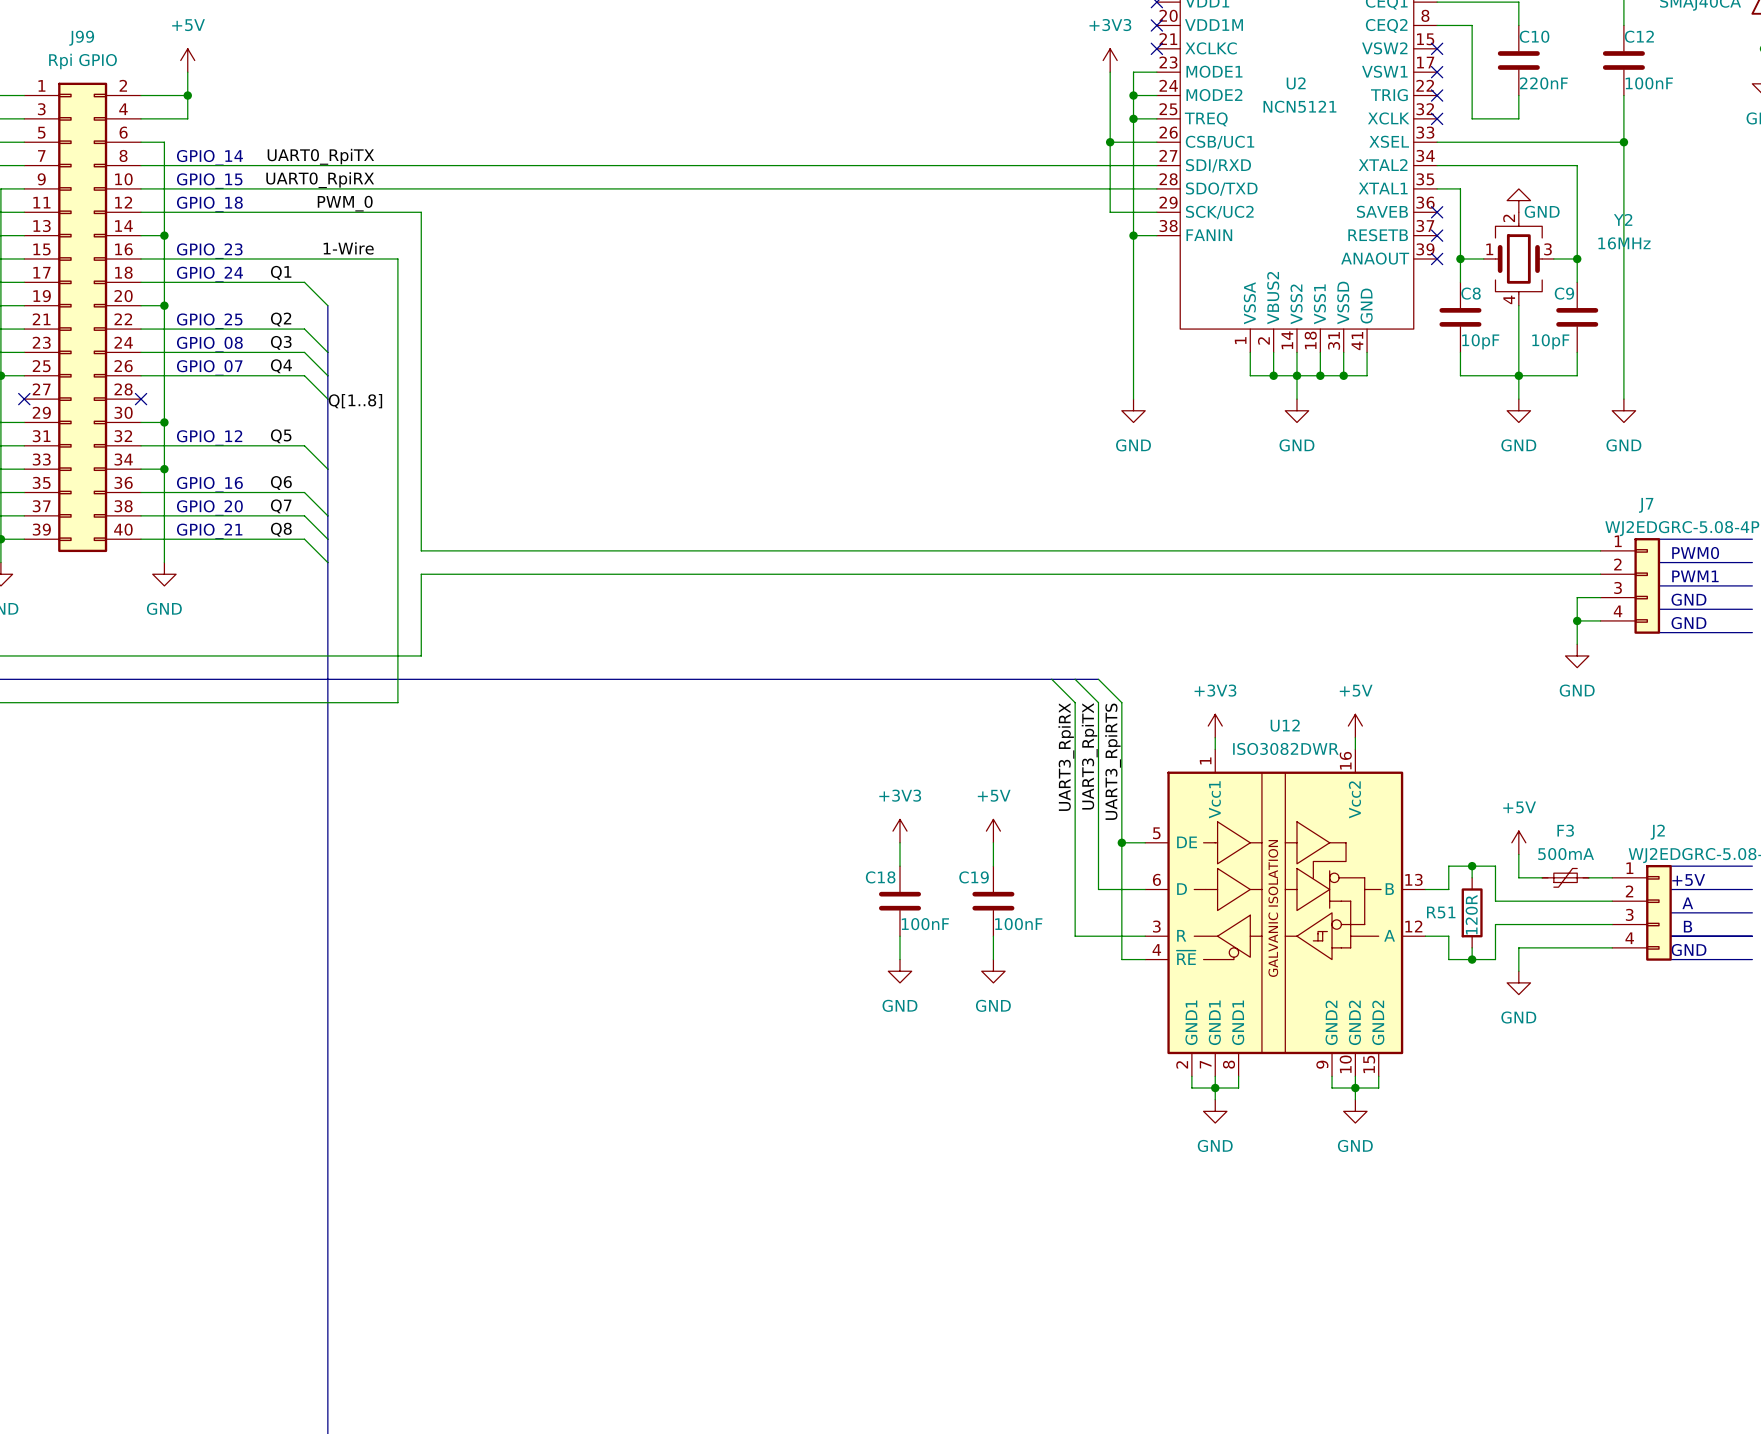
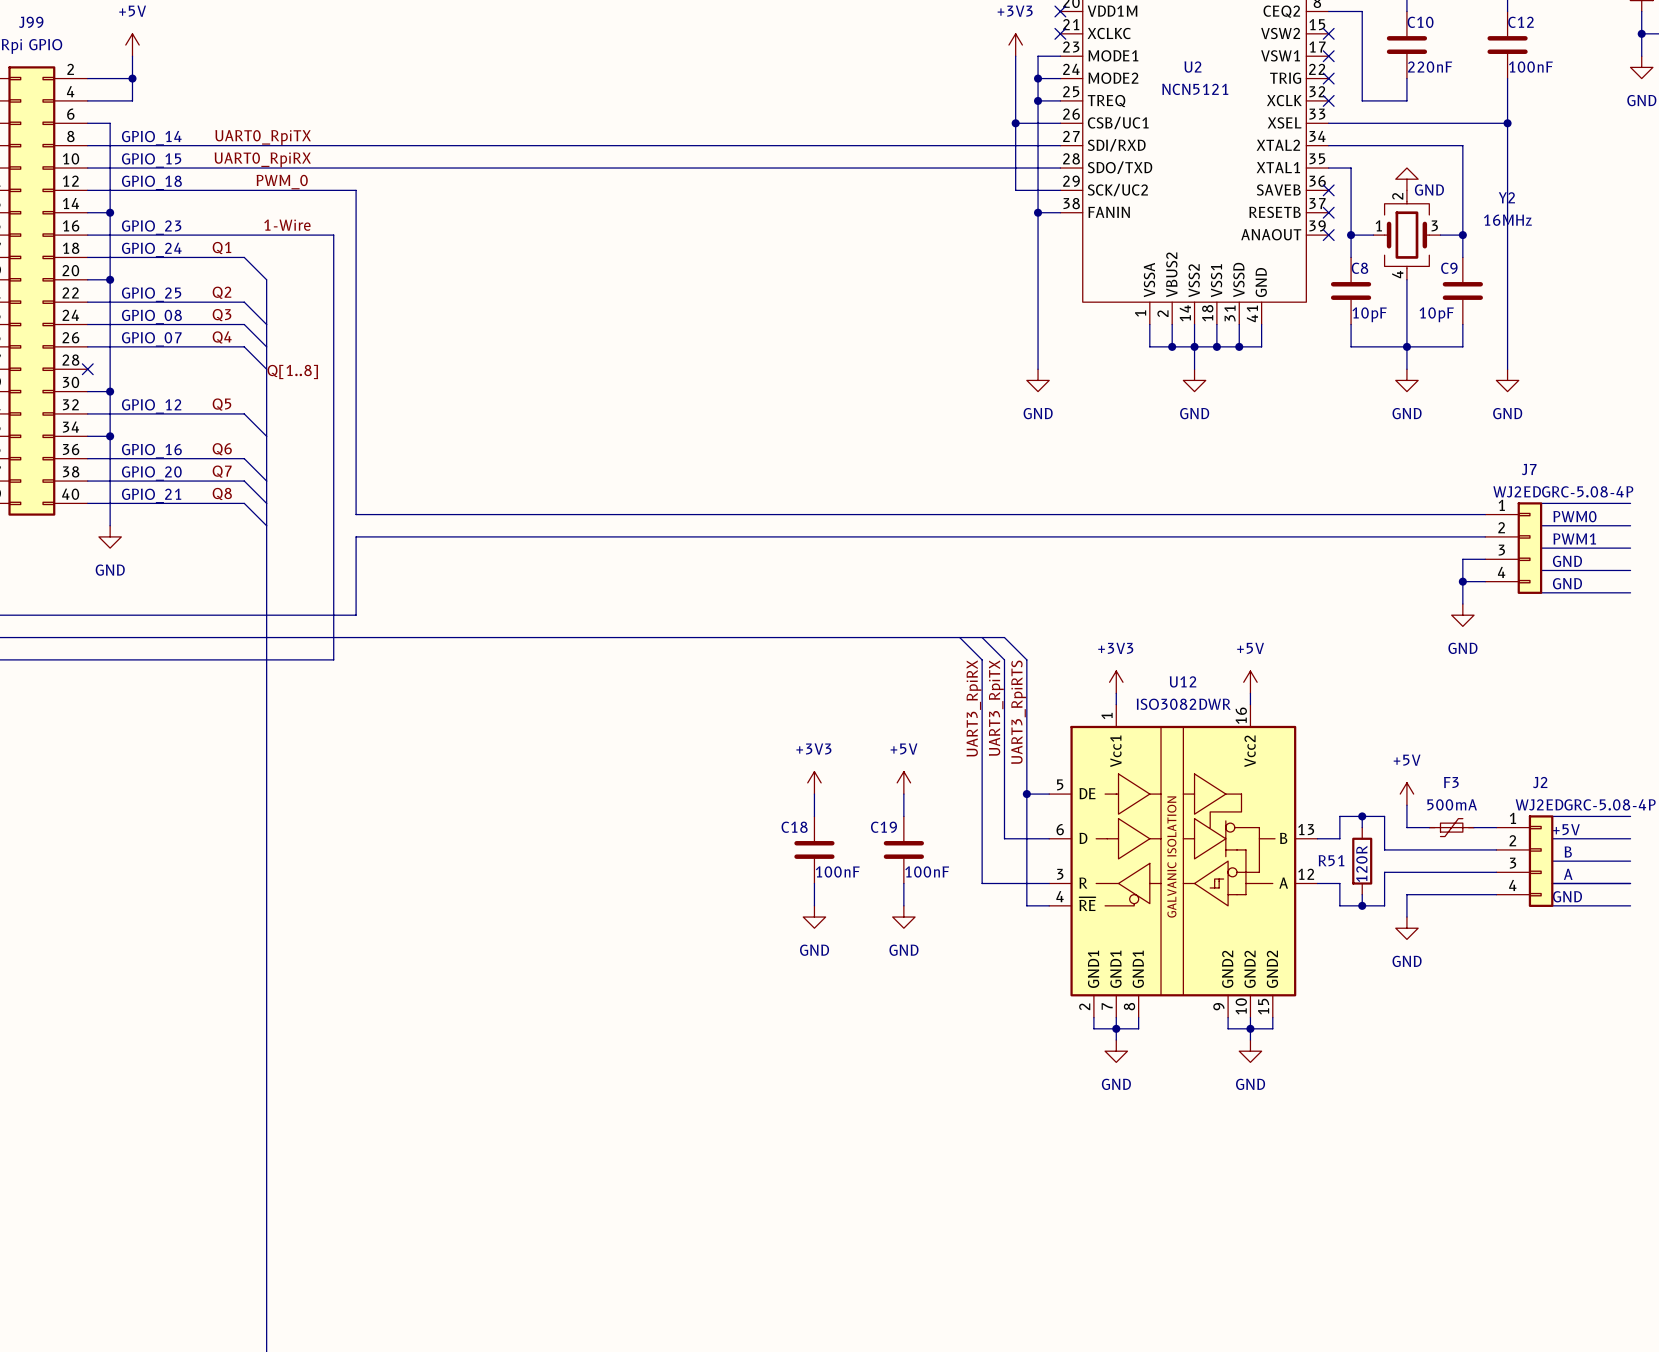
text: A (1687, 903) -> B (1568, 852)
text: B (1688, 926) -> A (1568, 874)

